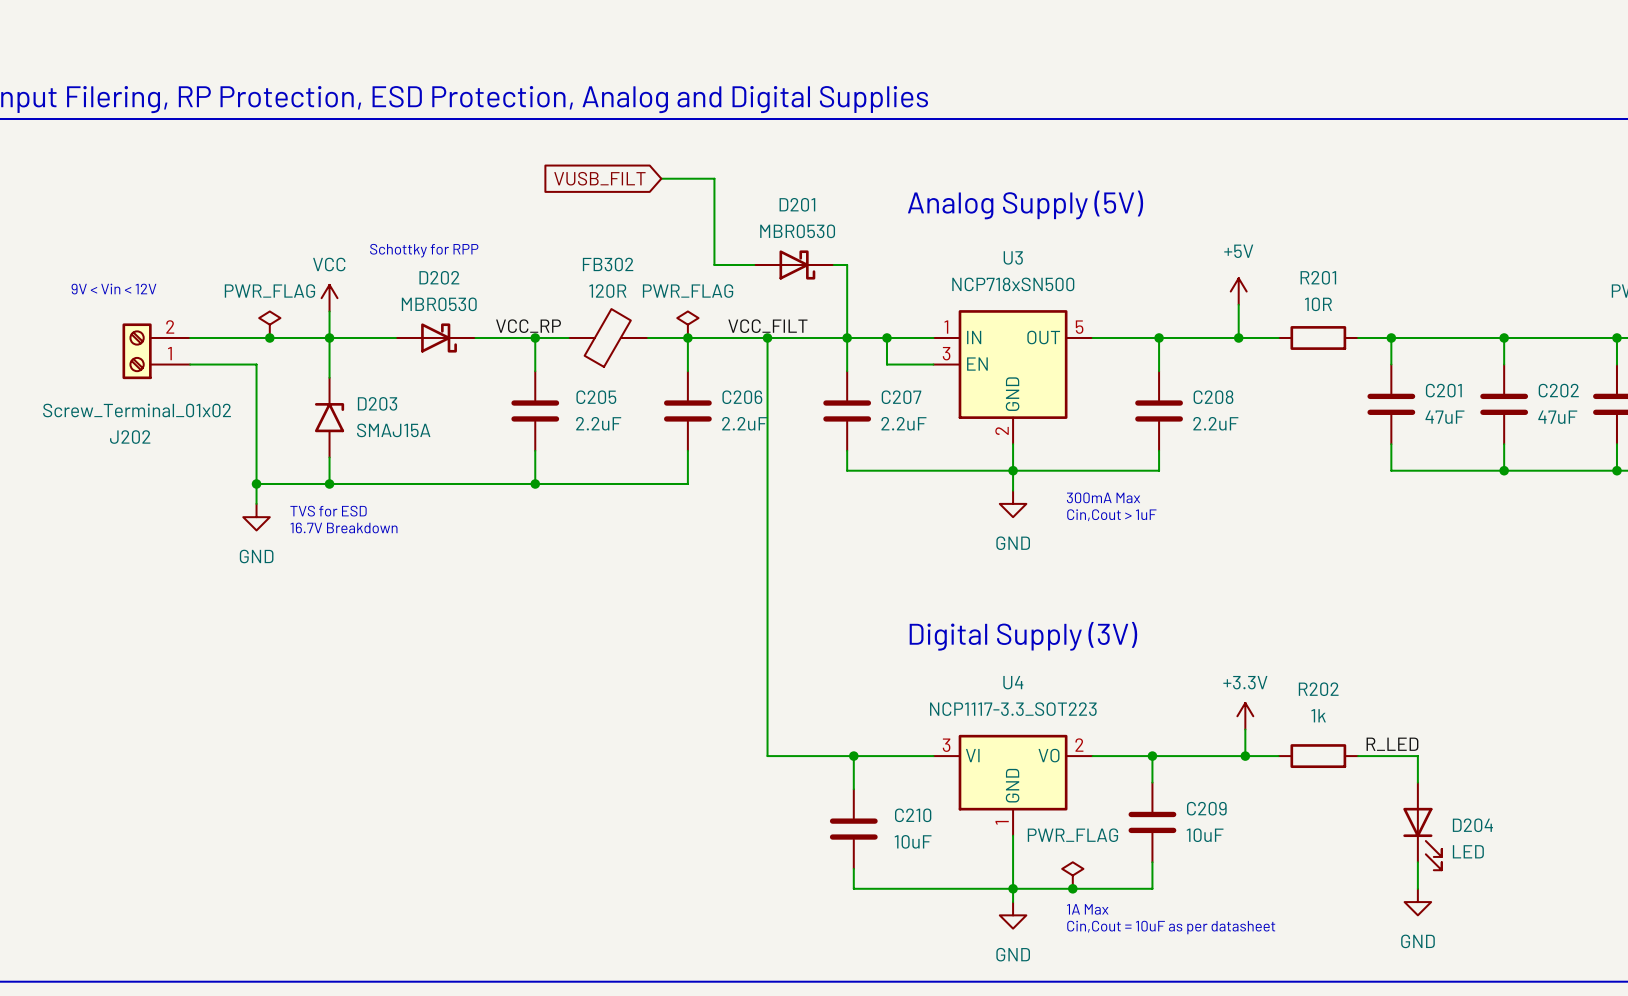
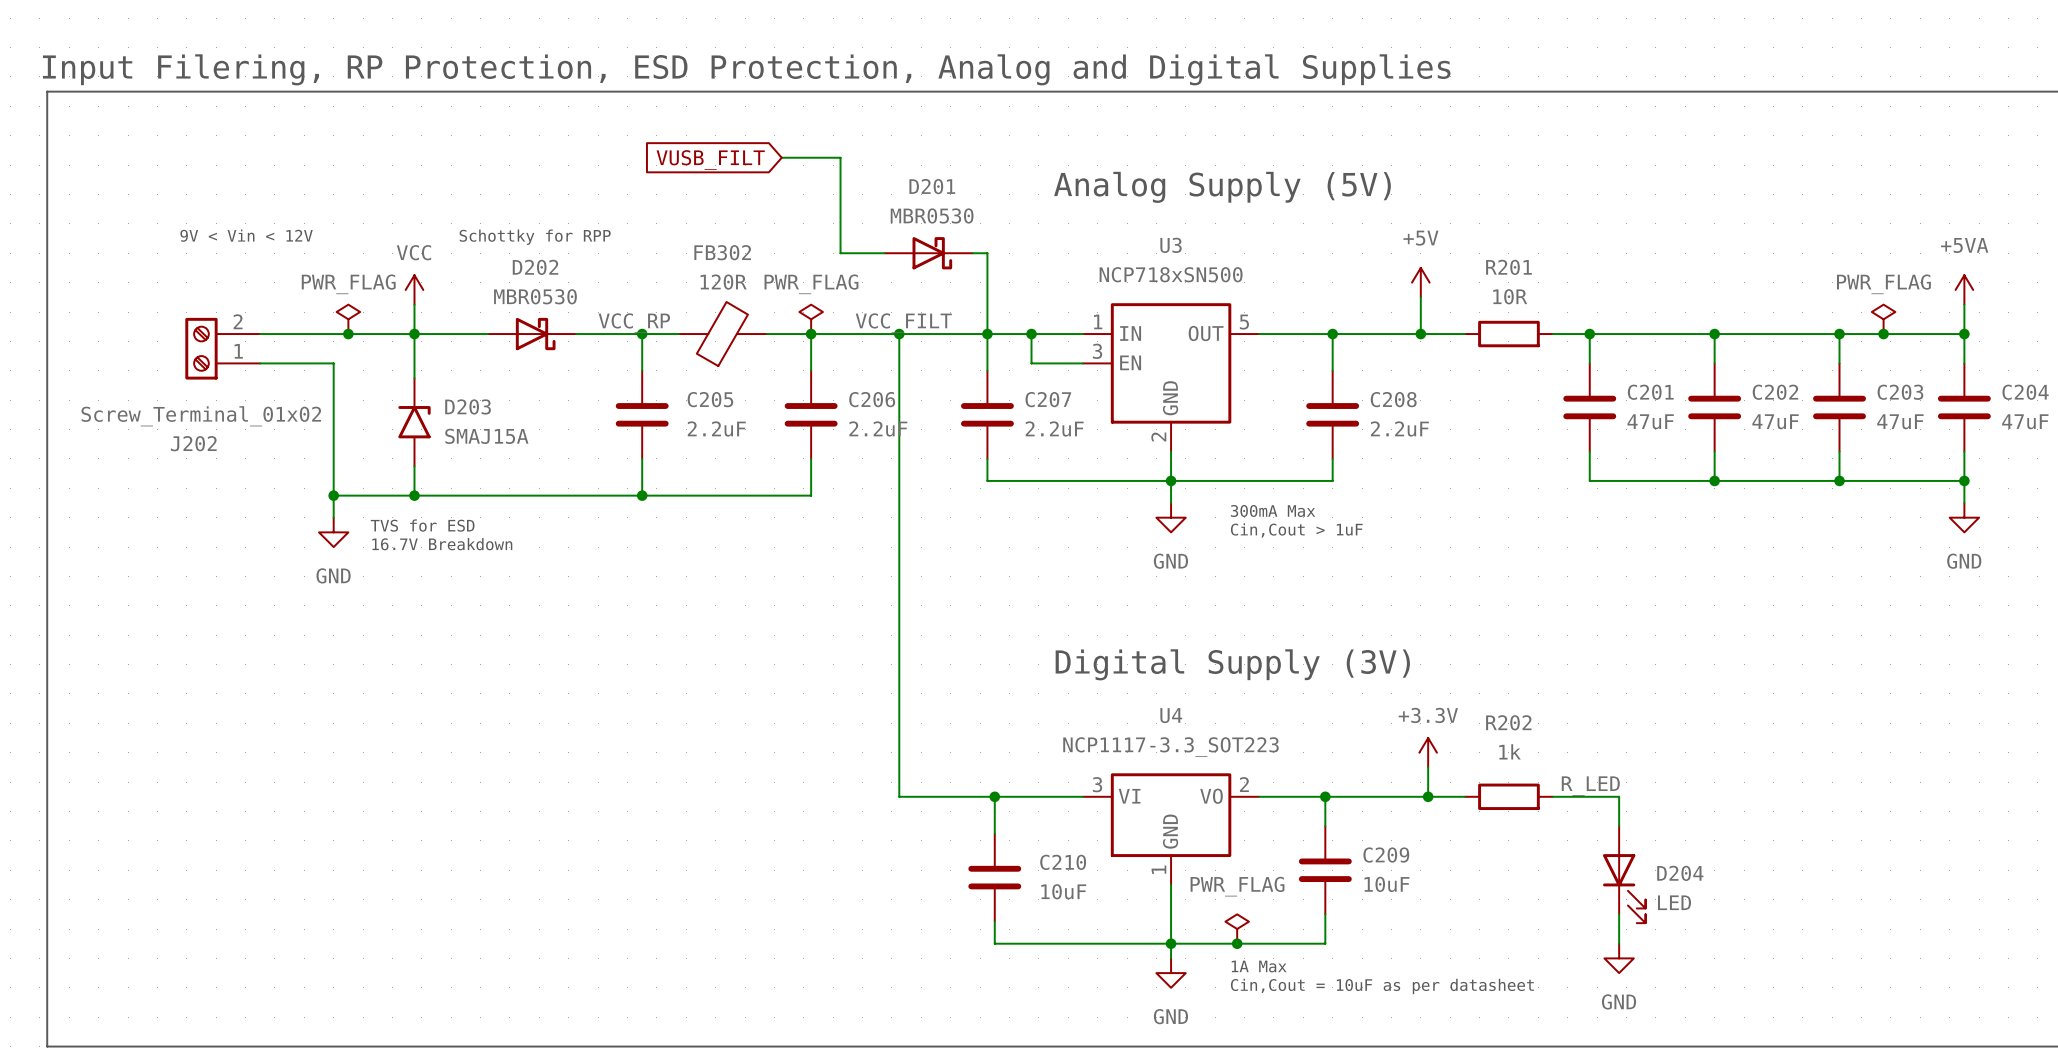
text position: 9V < Vin < 12V (113, 289) -> 9V < Vin < 12V (246, 235)

